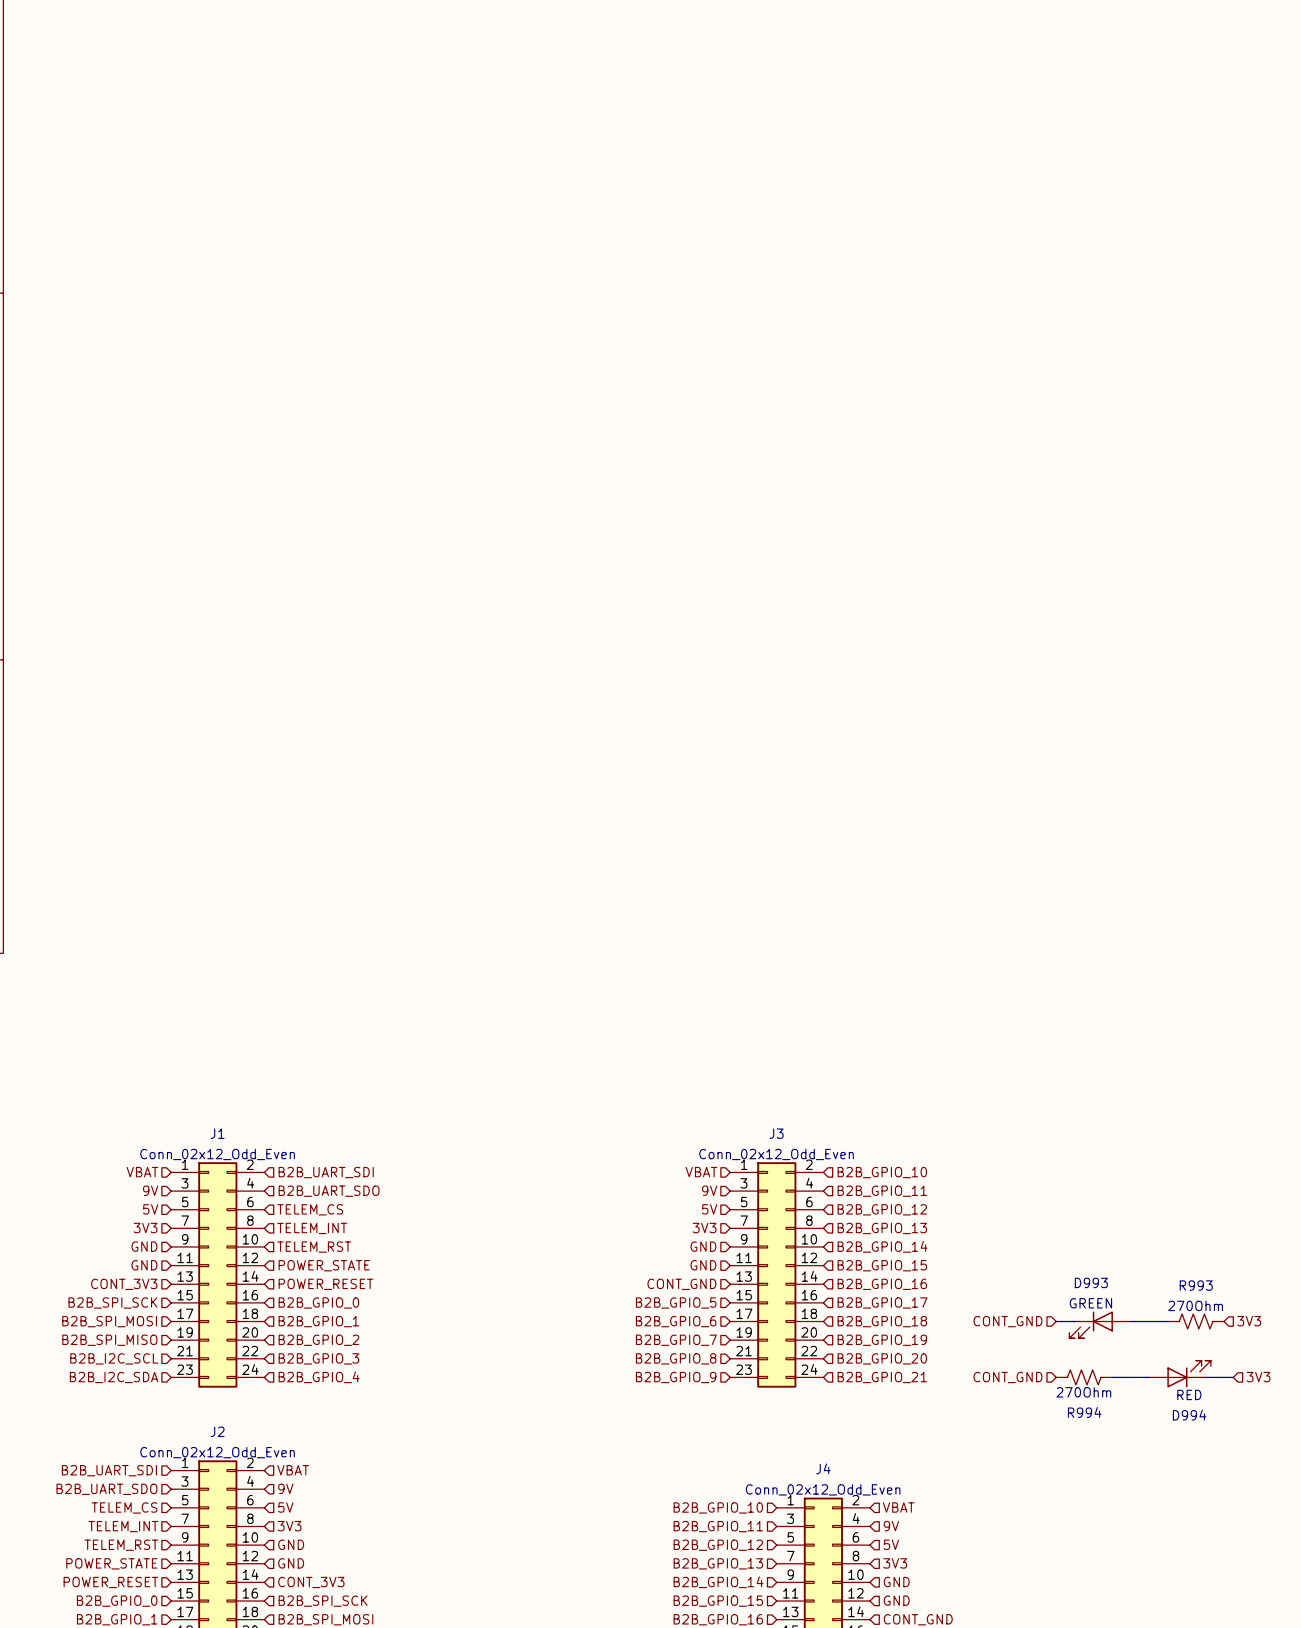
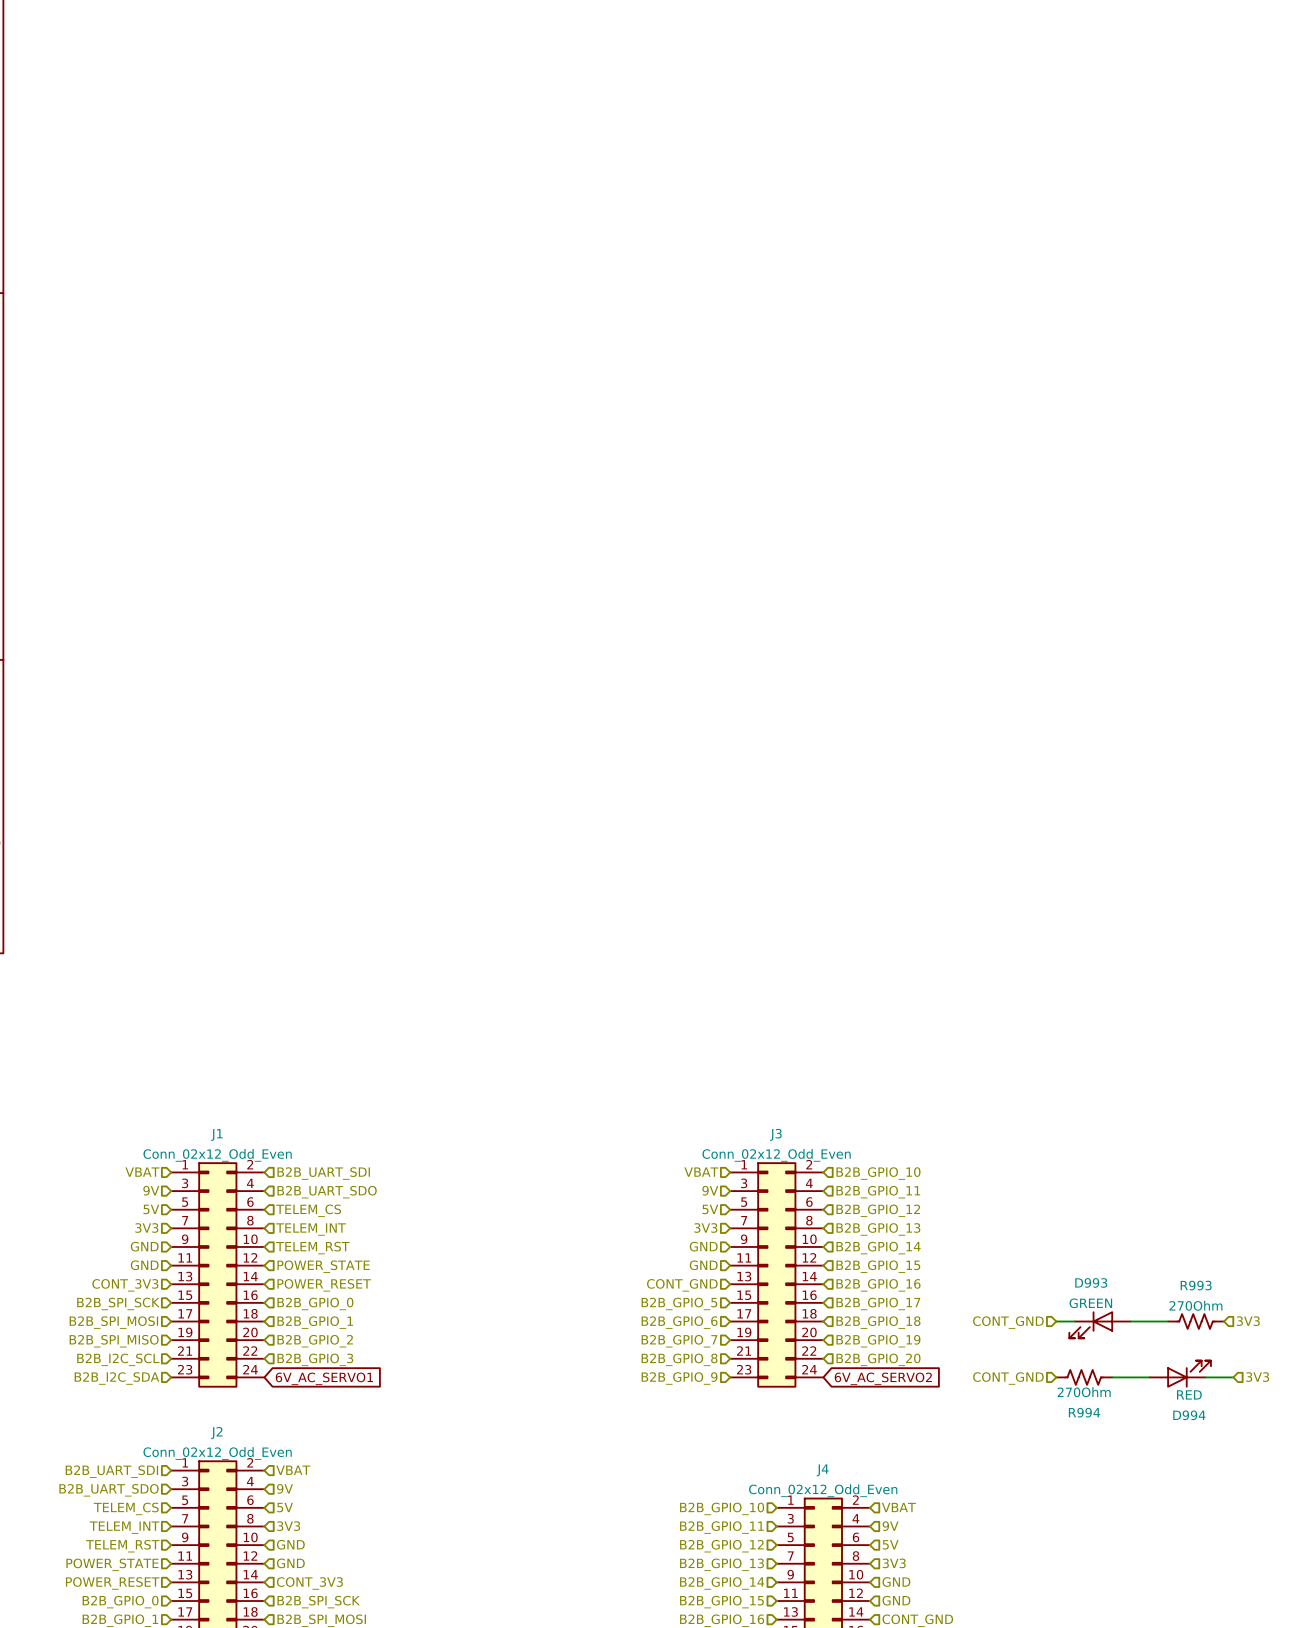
hierarchical label: B2B_GPIO_4 (319, 1377) -> none
global label: none -> 6V_AC_SERVO1 (324, 1378)
hierarchical label: B2B_GPIO_21 (882, 1377) -> none
global label: none -> 6V_AC_SERVO2 (883, 1378)

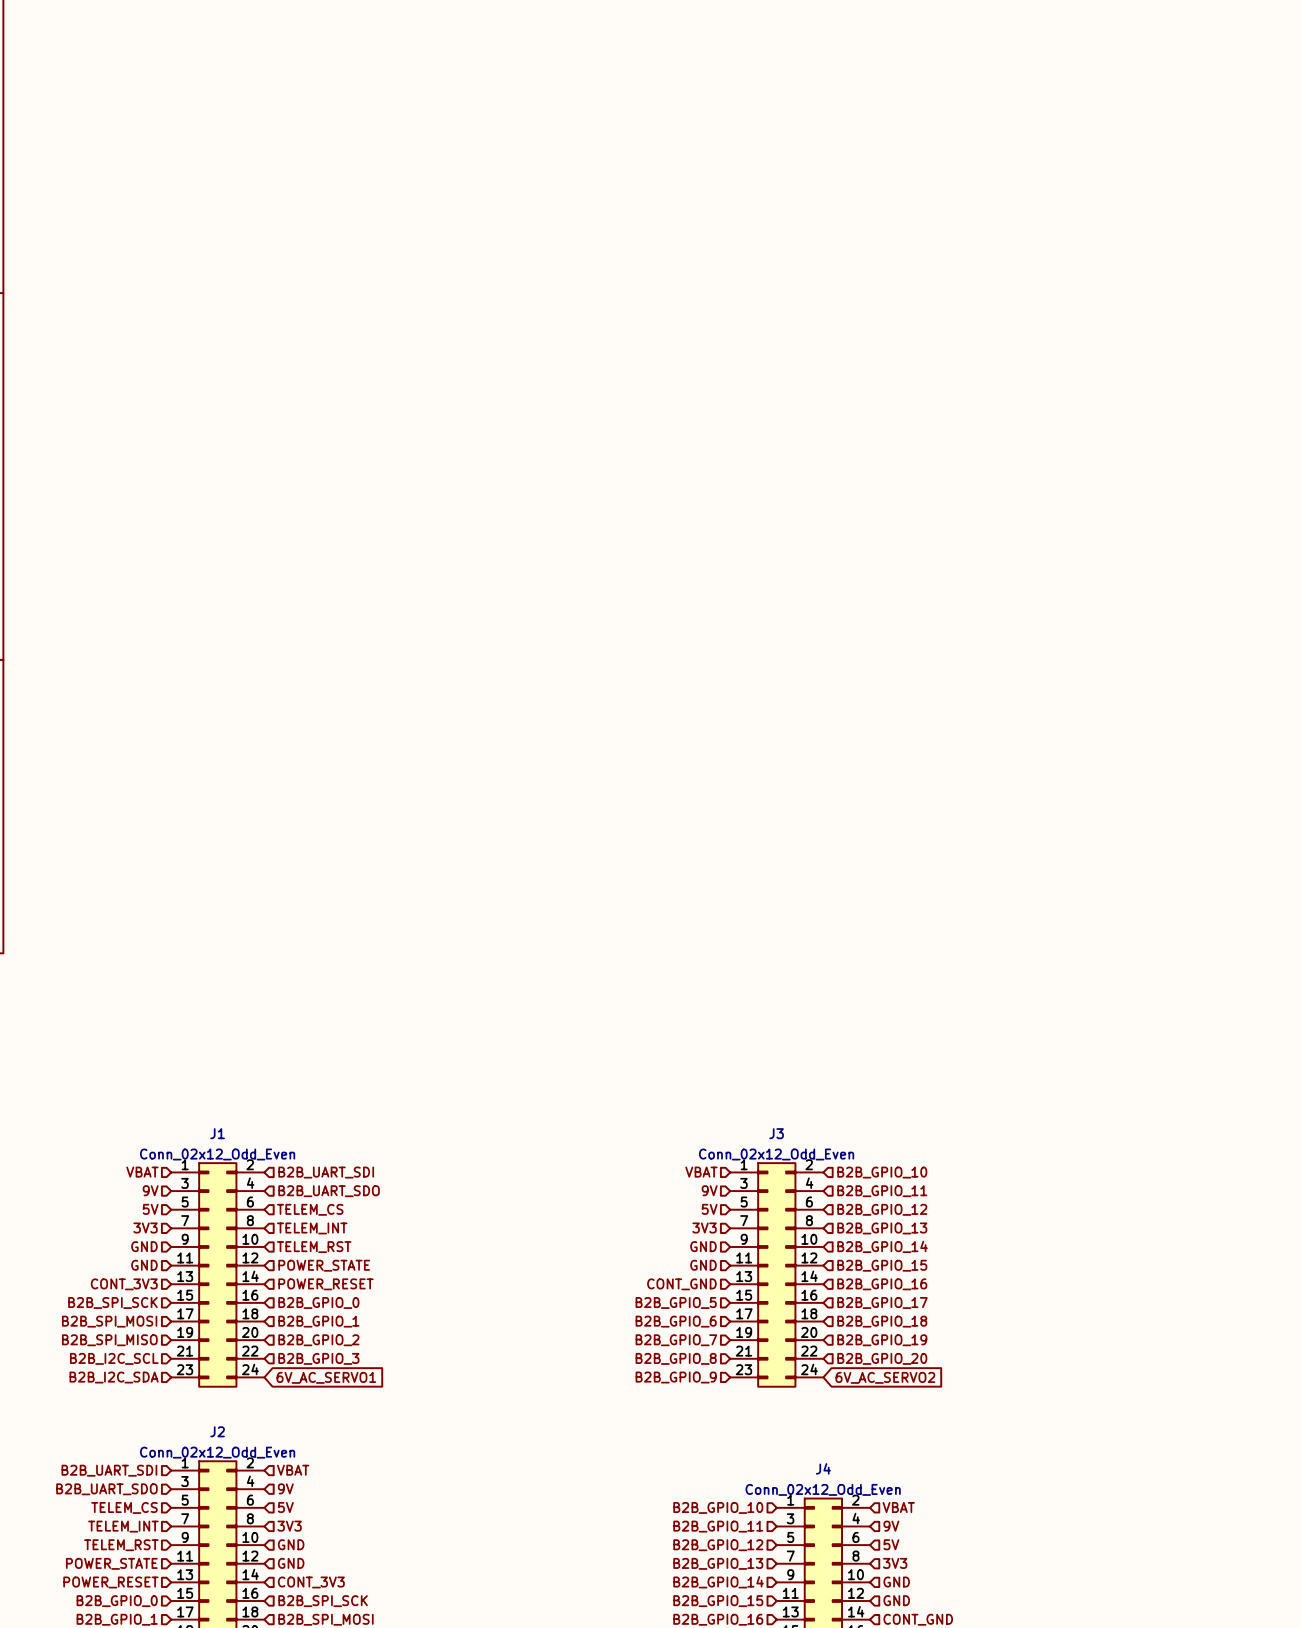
wire: (1056, 1321) (1074, 1321) -> none
wire: (1130, 1321) (1168, 1321) -> none
R993: 270Ohm (1196, 1321) -> none
hierarchical label: 3V3 (1248, 1321) -> none
hierarchical label: CONT_GND (1008, 1322) -> none
D993: GREEN (1100, 1324) -> none
D994: RED (1180, 1374) -> none
R994: 270Ohm (1084, 1377) -> none
wire: (1112, 1377) (1149, 1377) -> none
wire: (1205, 1377) (1233, 1377) -> none
hierarchical label: 3V3 (1257, 1377) -> none
hierarchical label: CONT_GND (1008, 1378) -> none

